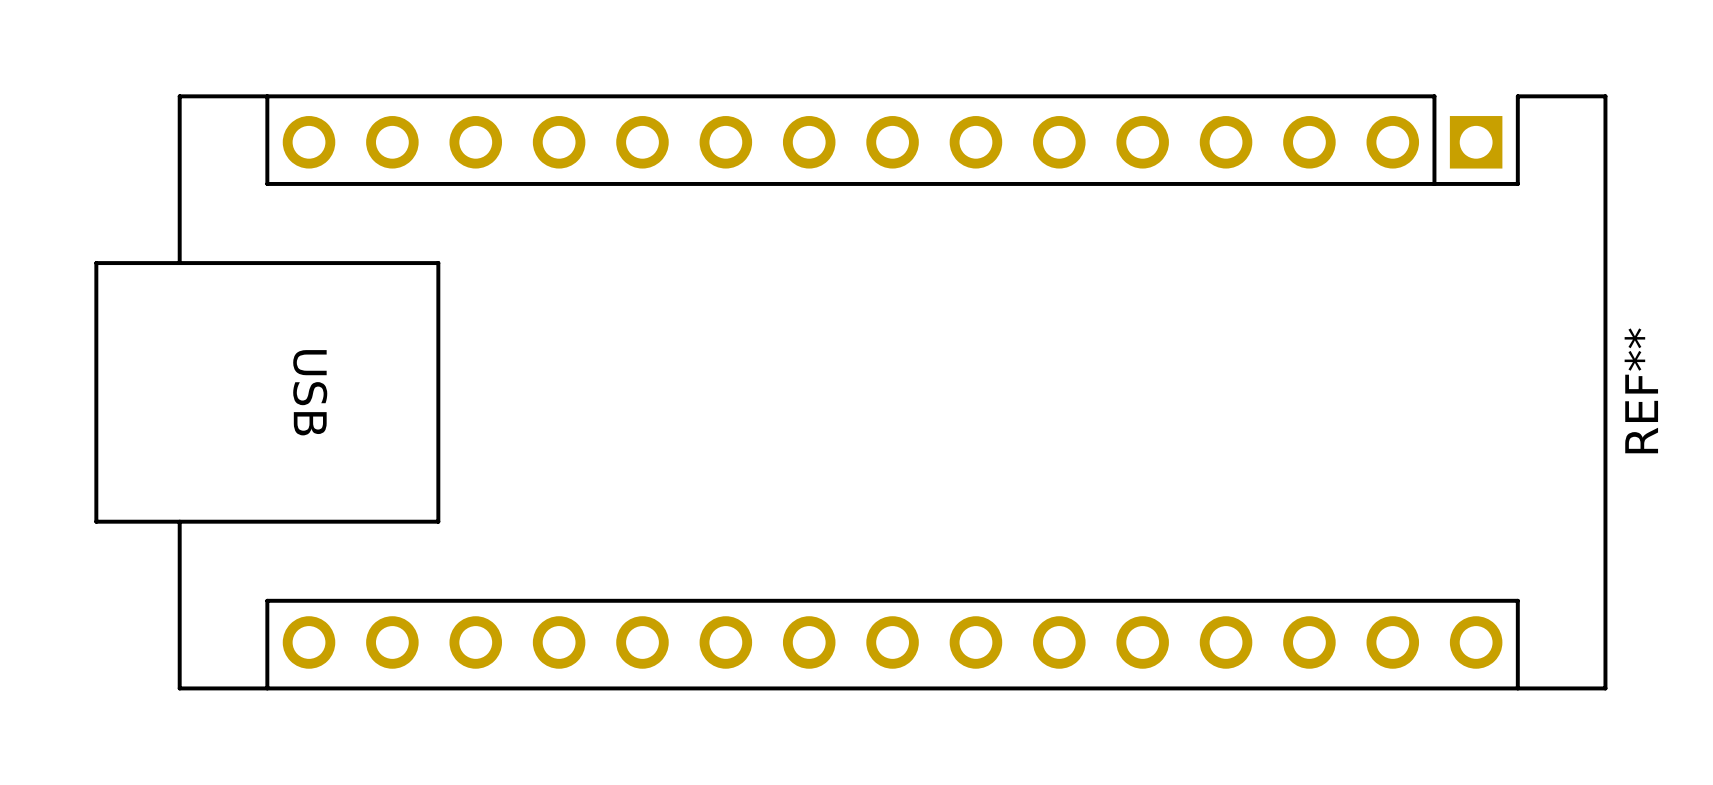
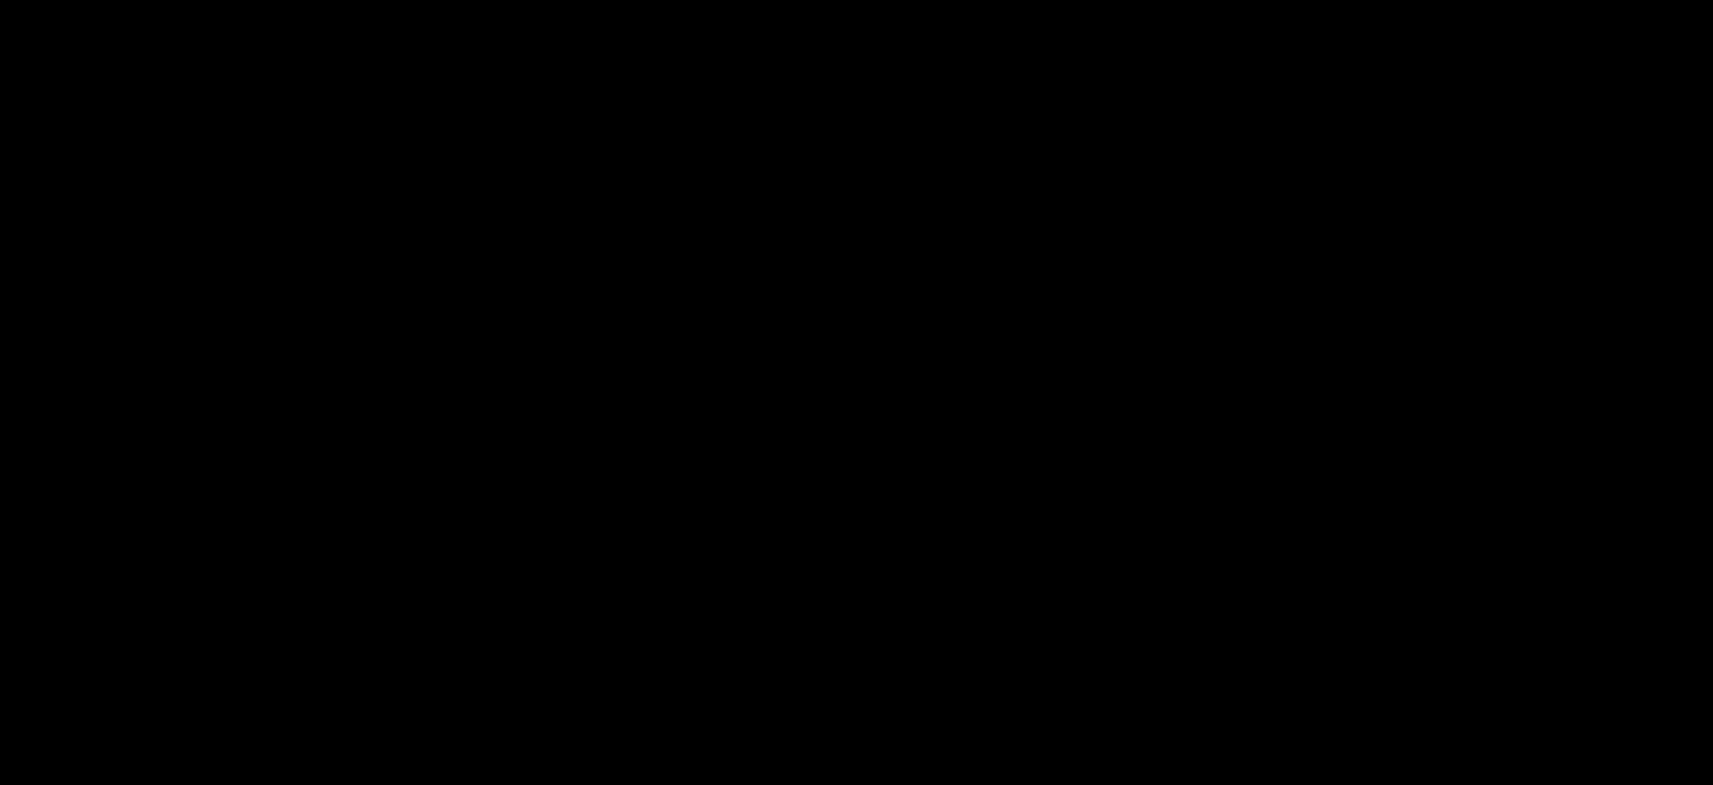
REF**: (850, 392) -> none

